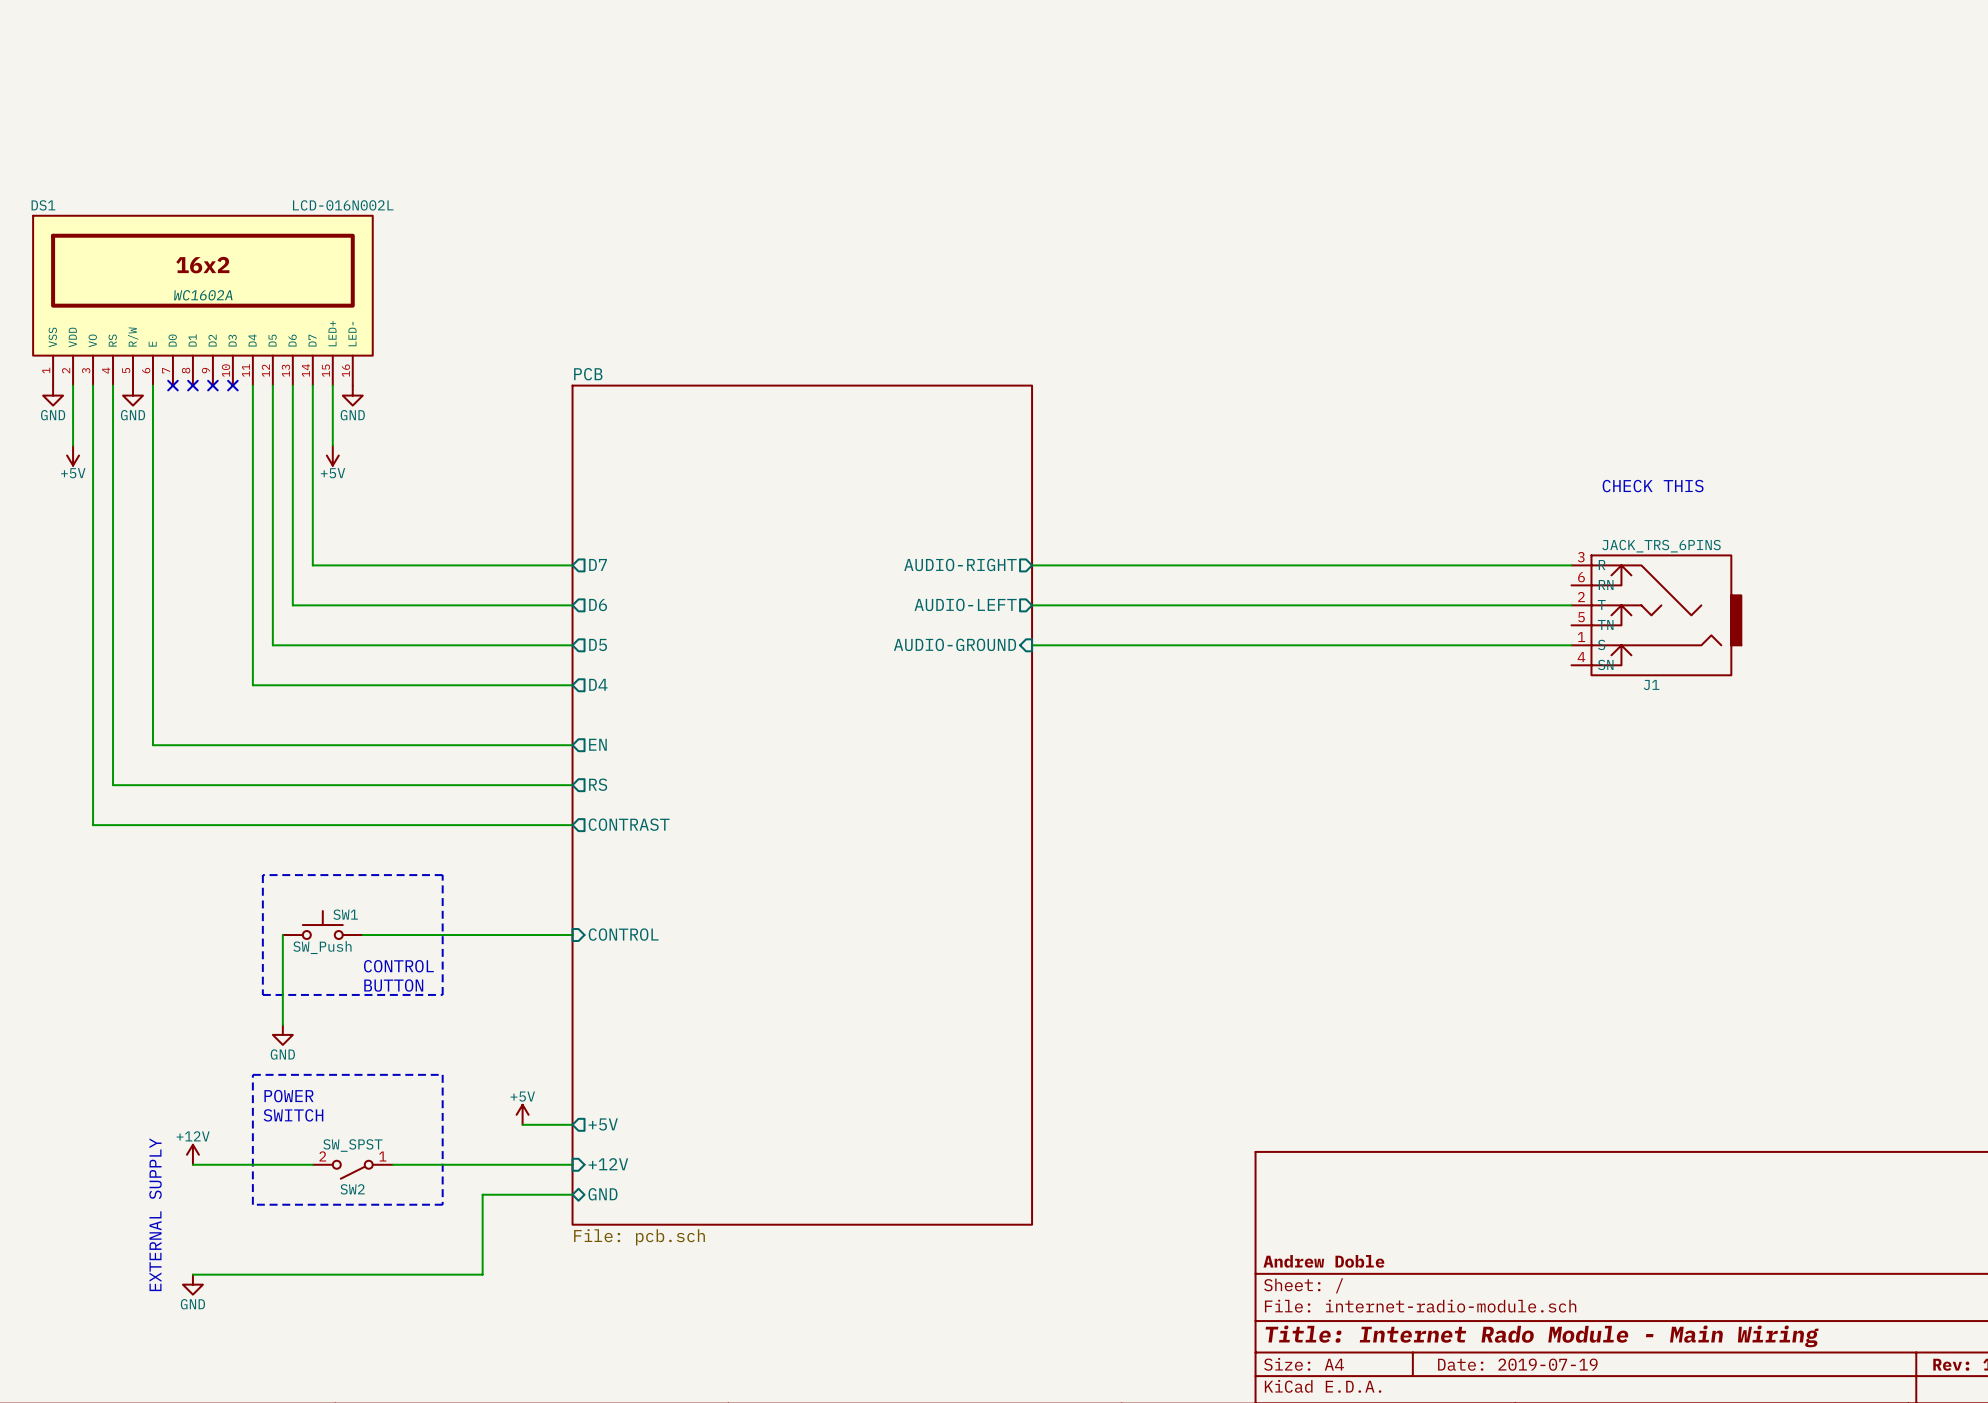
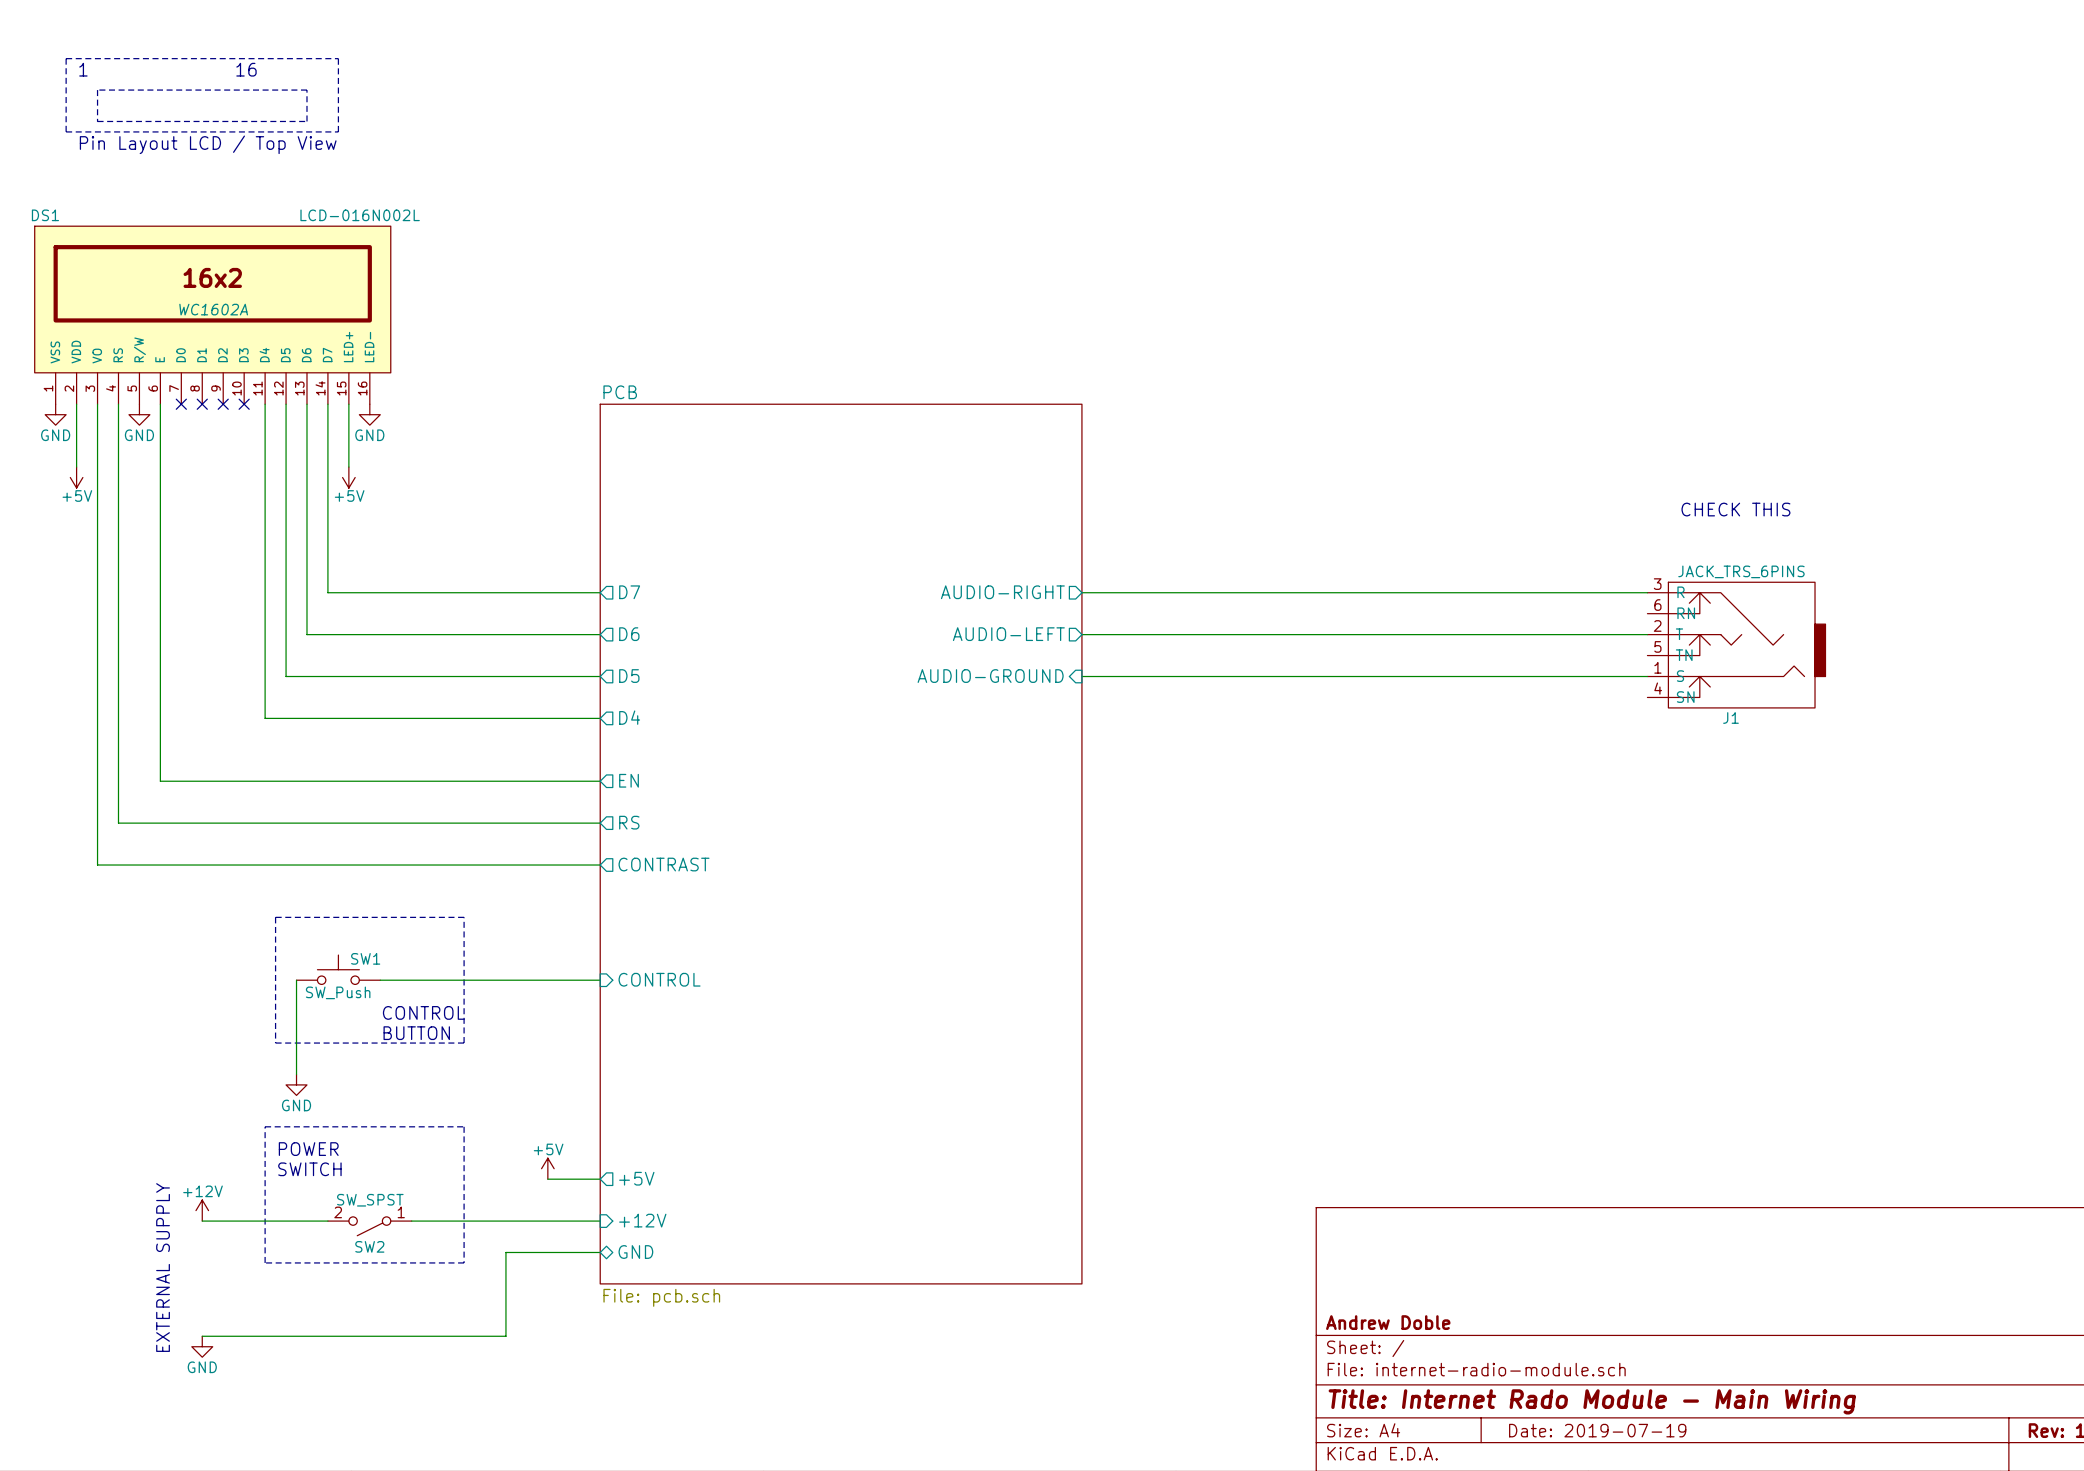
line: none -> (66, 58) (338, 58) (338, 131) (66, 131) (66, 58)
text: none -> 1 (83, 69)
text: none -> 16 (246, 69)
line: none -> (97, 90) (97, 121) (306, 121) (306, 90) (97, 90)
text: none -> Pin Layout LCD / Top View (208, 144)

